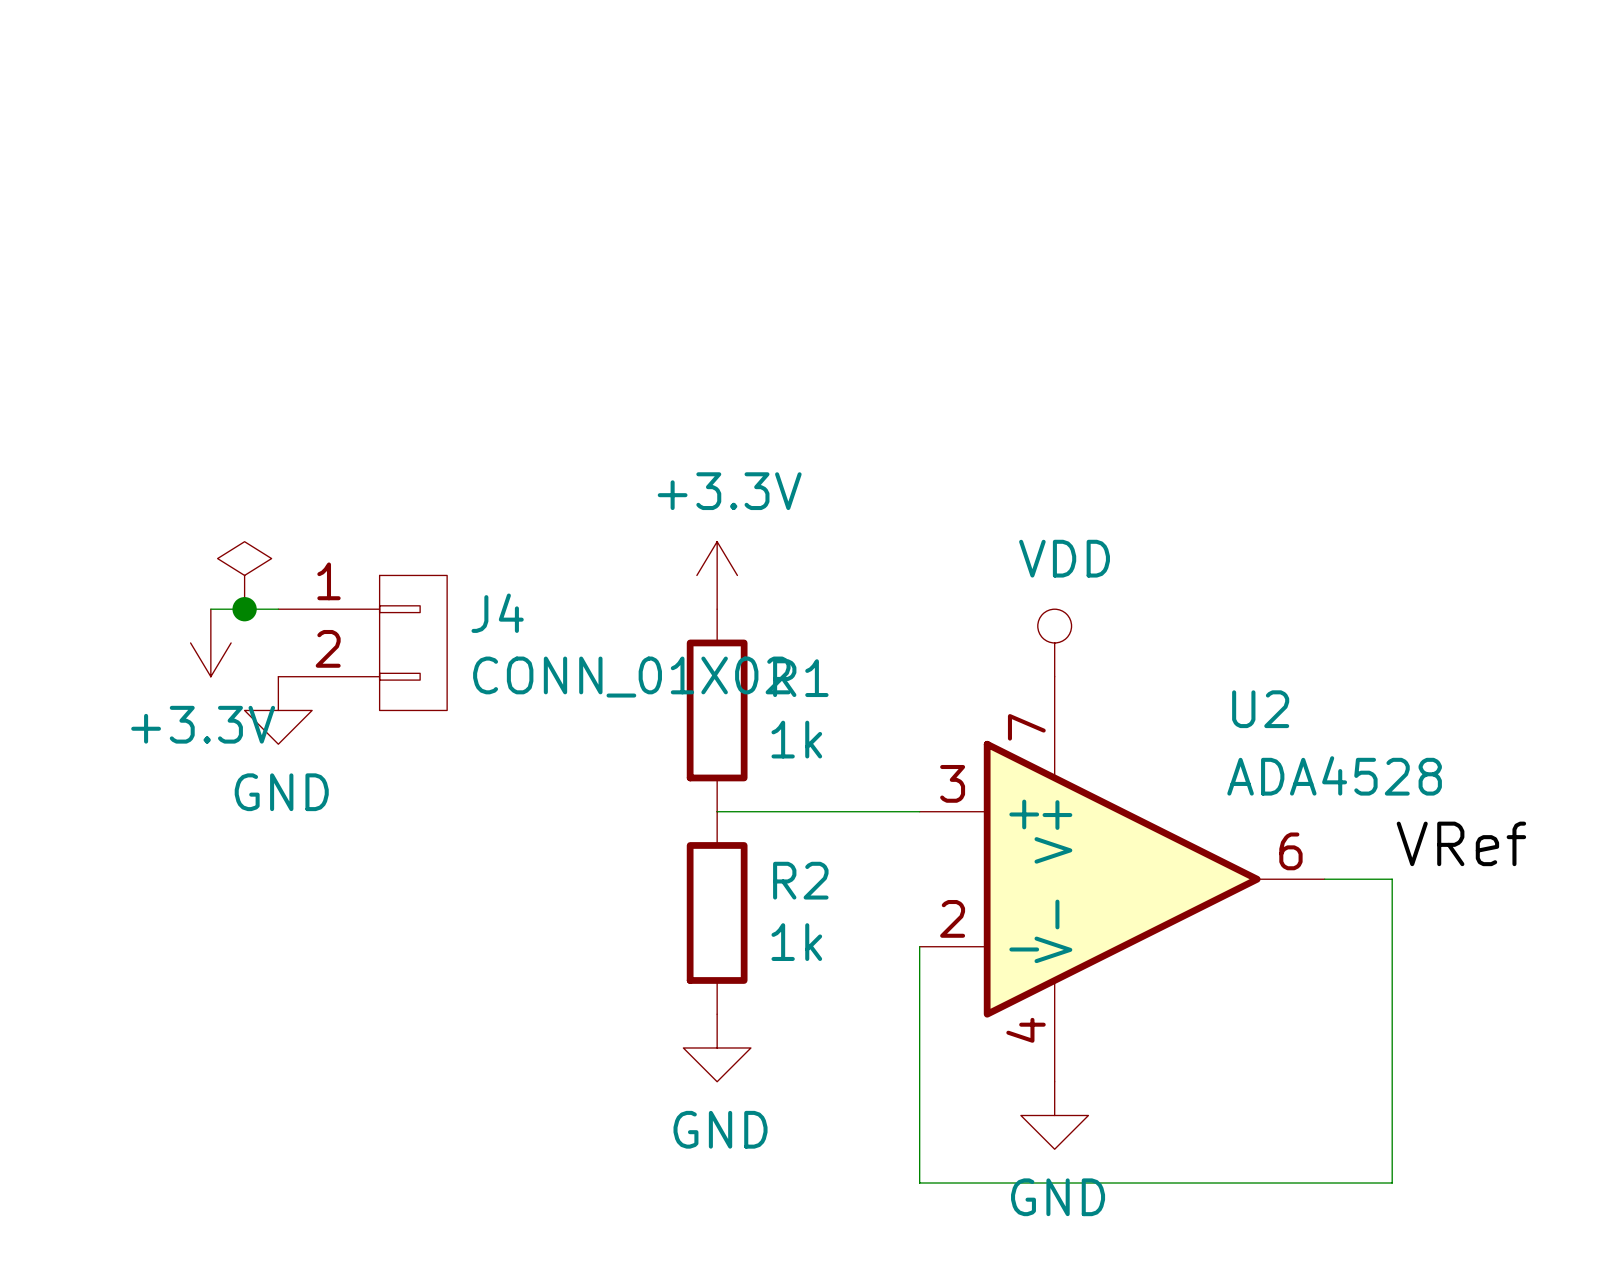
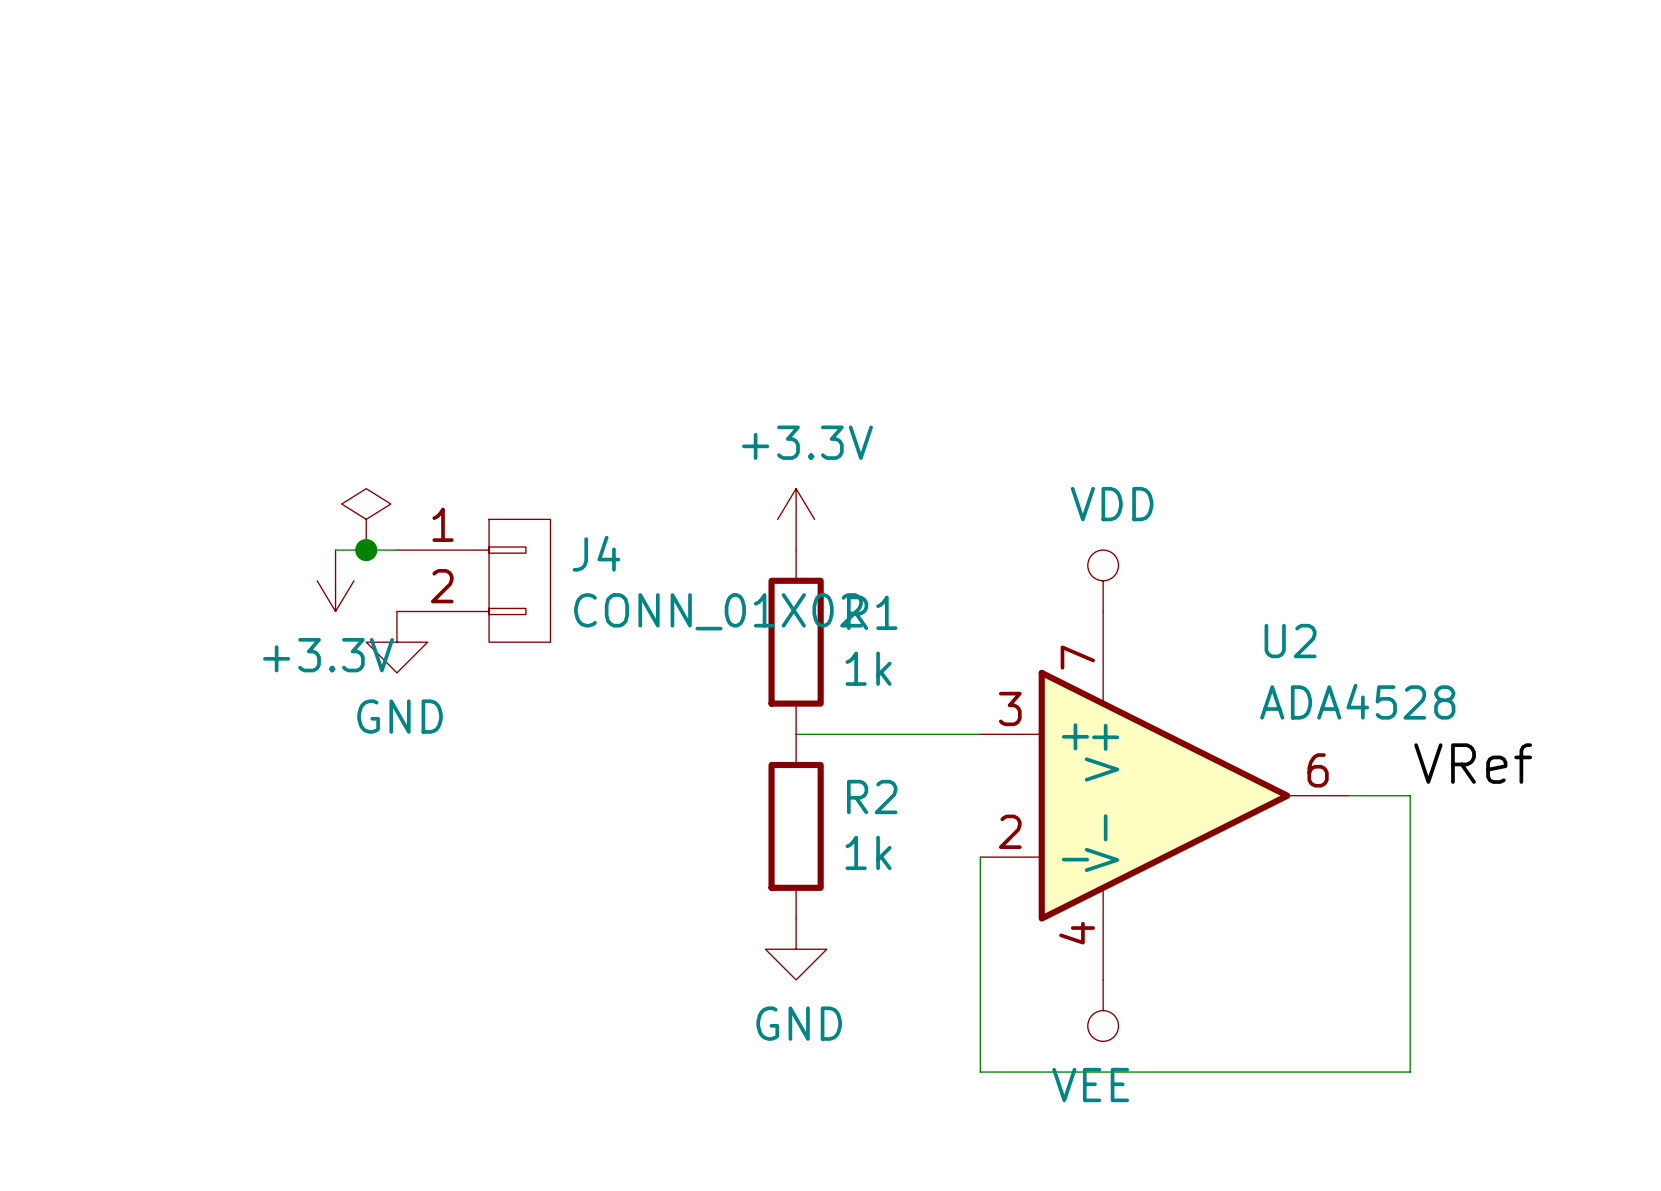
power symbol: GND (1054, 1115) -> VEE (1103, 1010)

